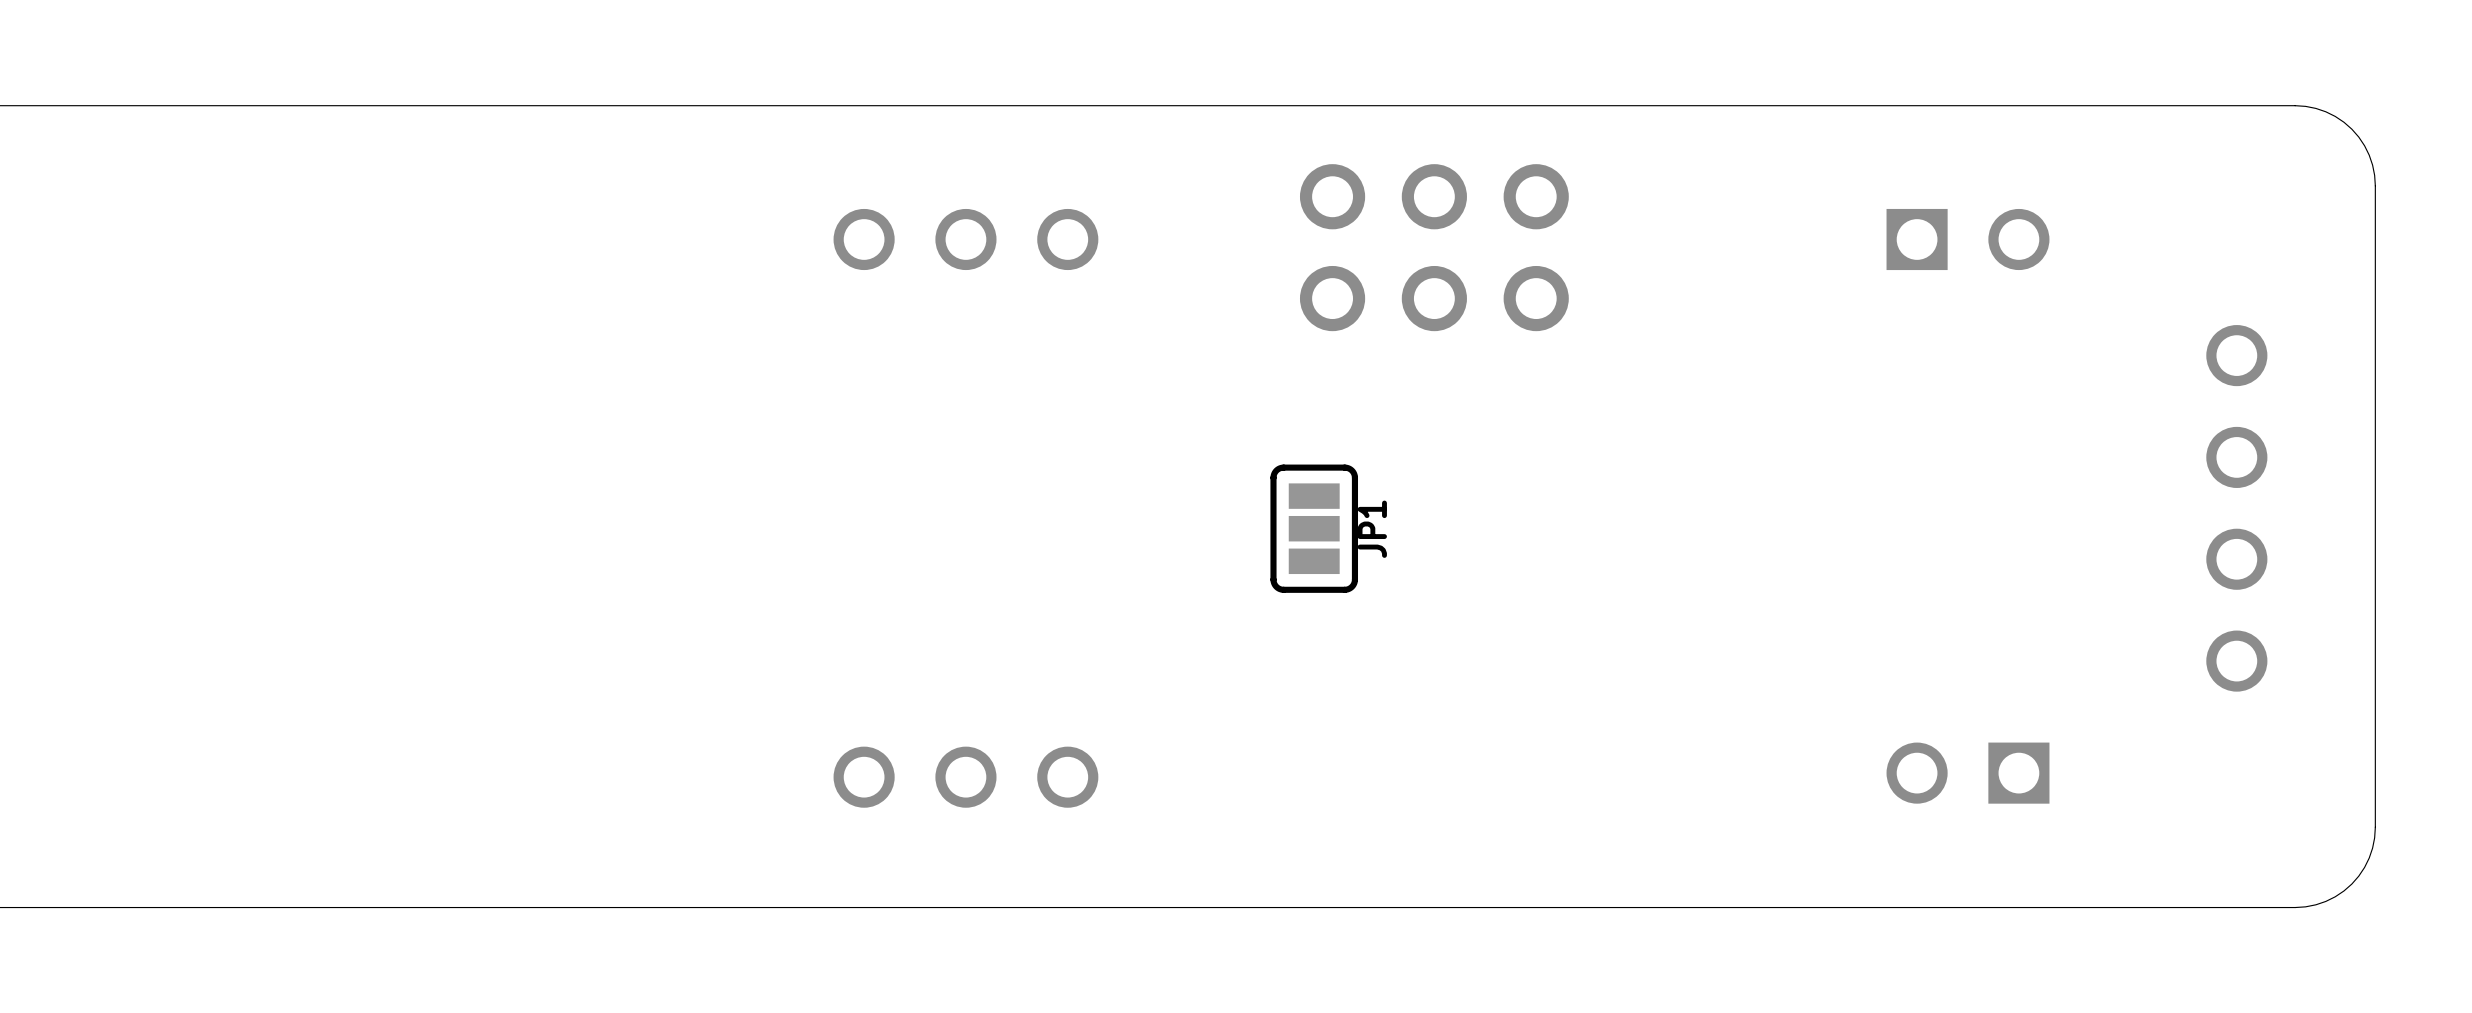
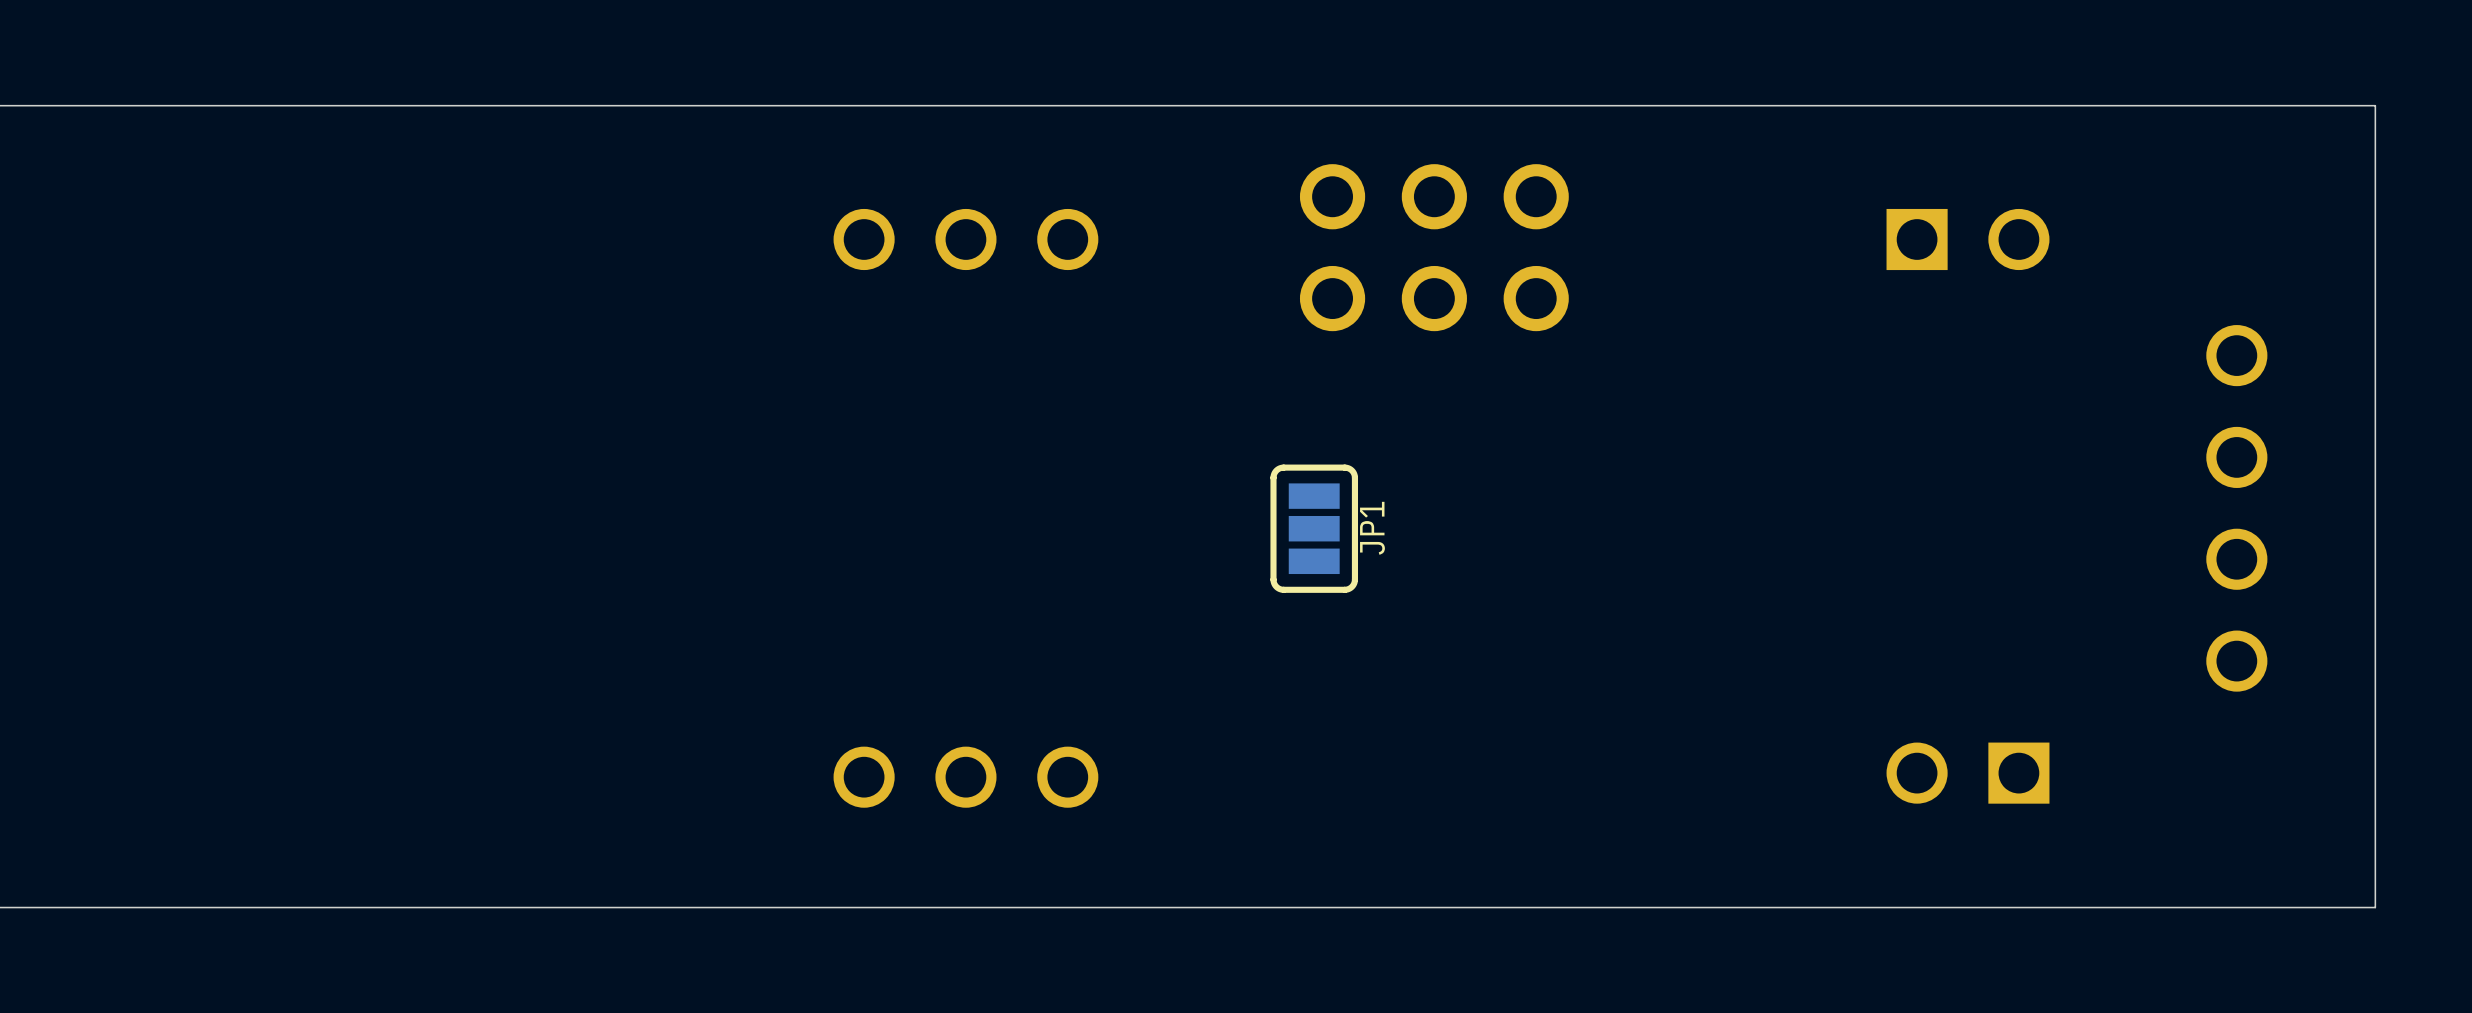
board edge: (2295, 105) (2325, 111) (2351, 129) (2369, 155) (2375, 185) -> (2295, 105) (2375, 105) (2375, 185)
board edge: (2375, 827) (2369, 858) (2351, 884) (2325, 901) (2295, 907) -> (2375, 827) (2375, 907) (2295, 907)

